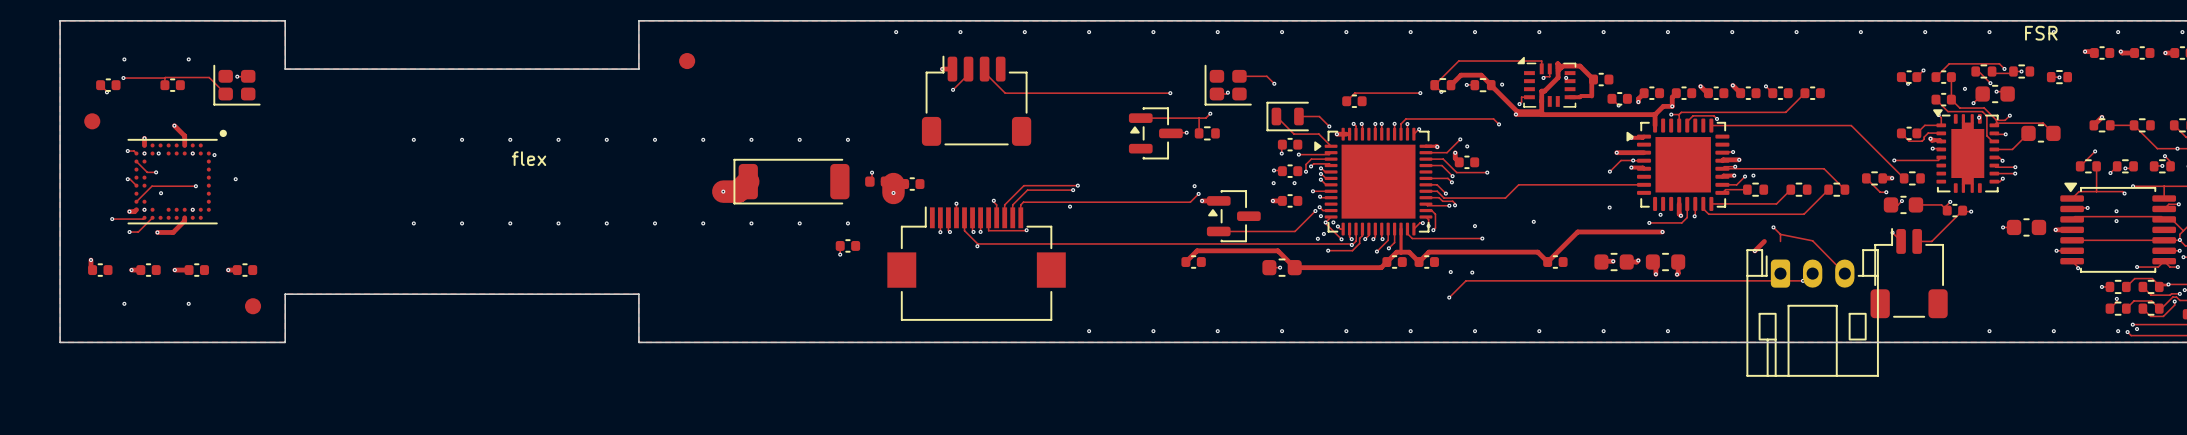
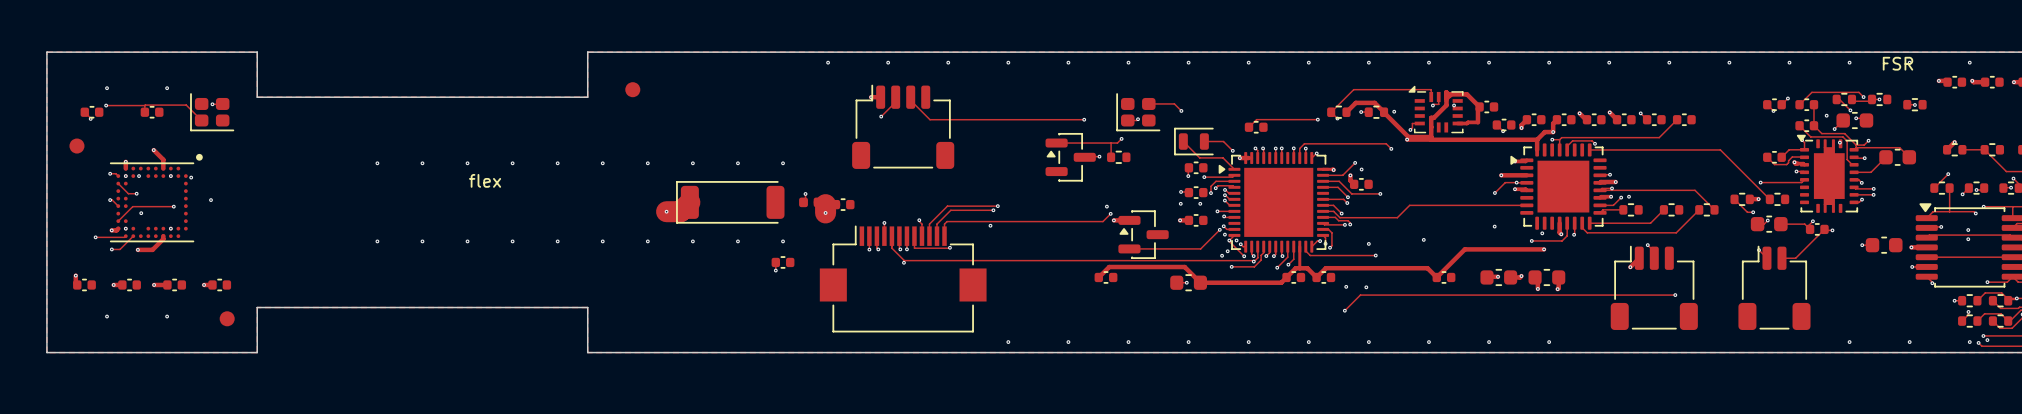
track: (1780, 234) (1812, 240) (1844, 273) -> none
part: none -> (1654, 287)
part: (1812, 312) -> none

